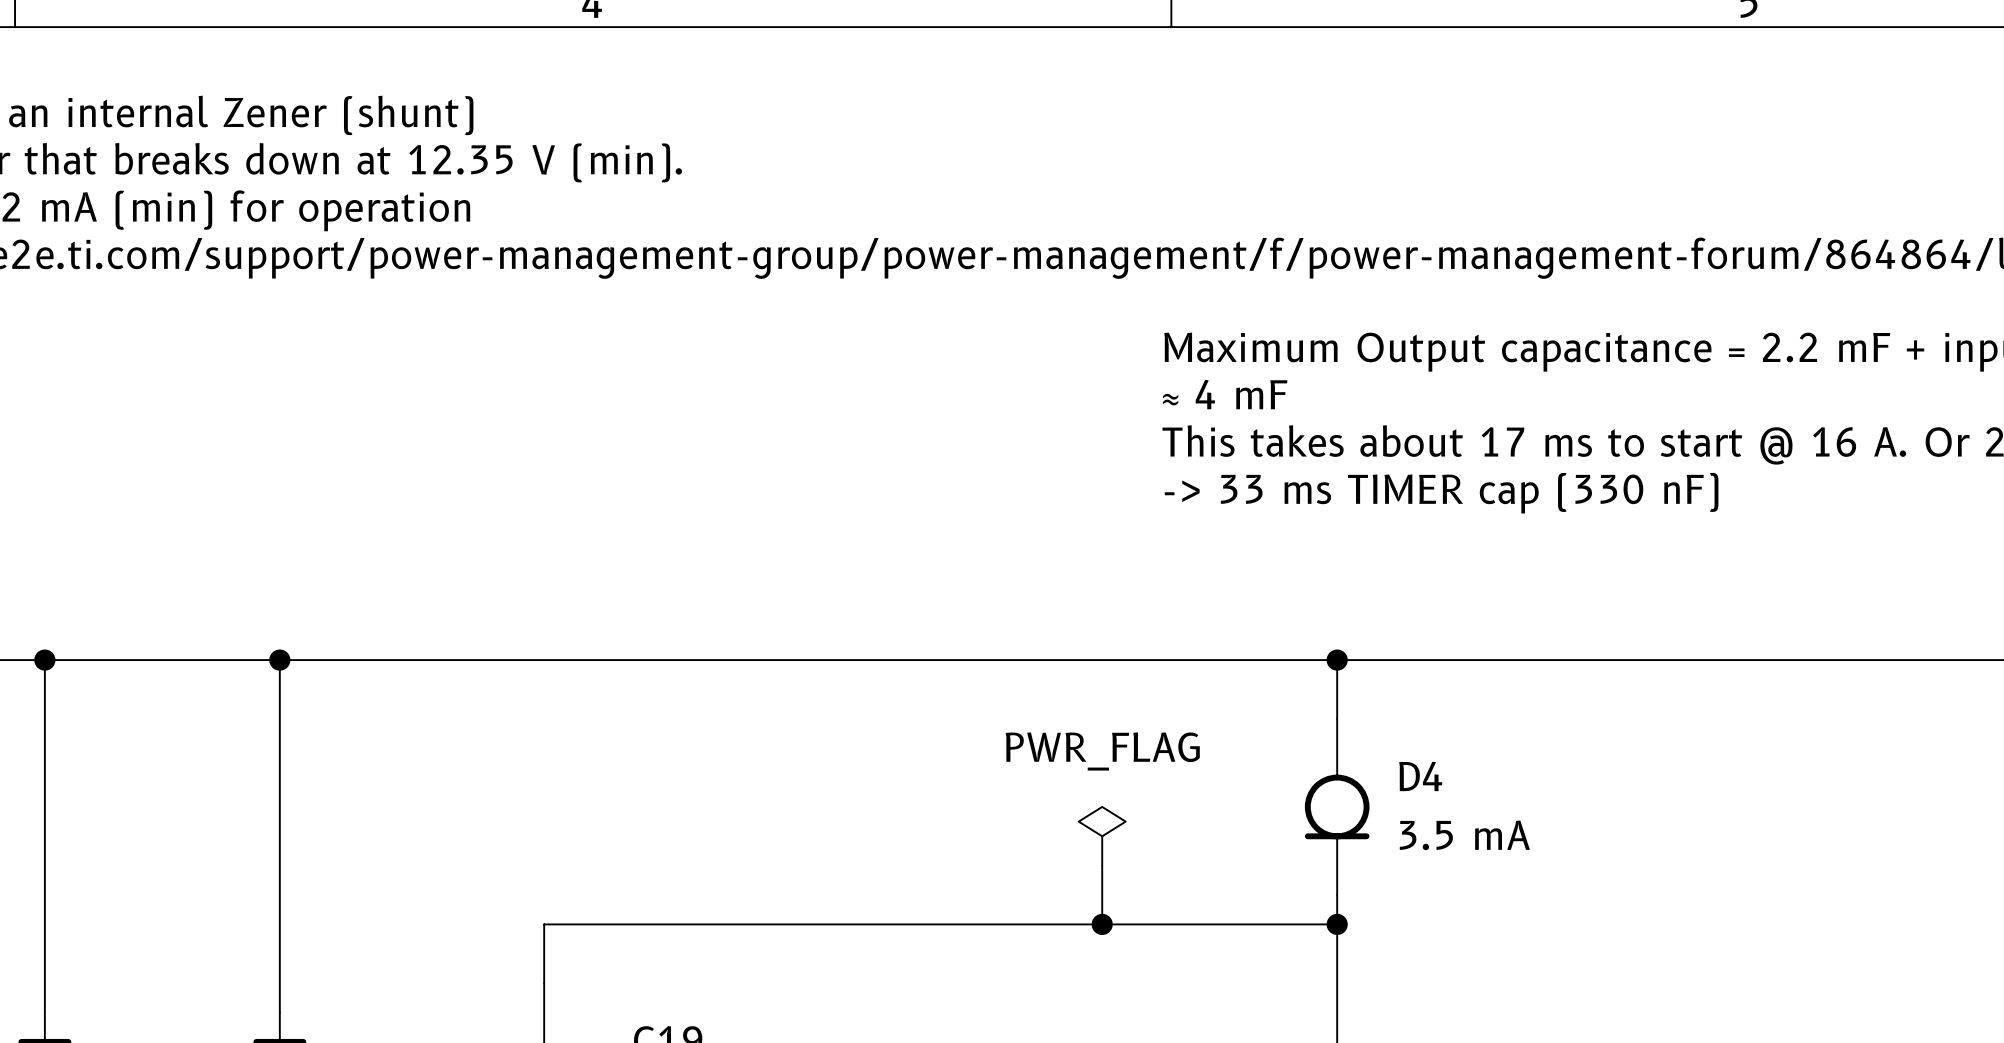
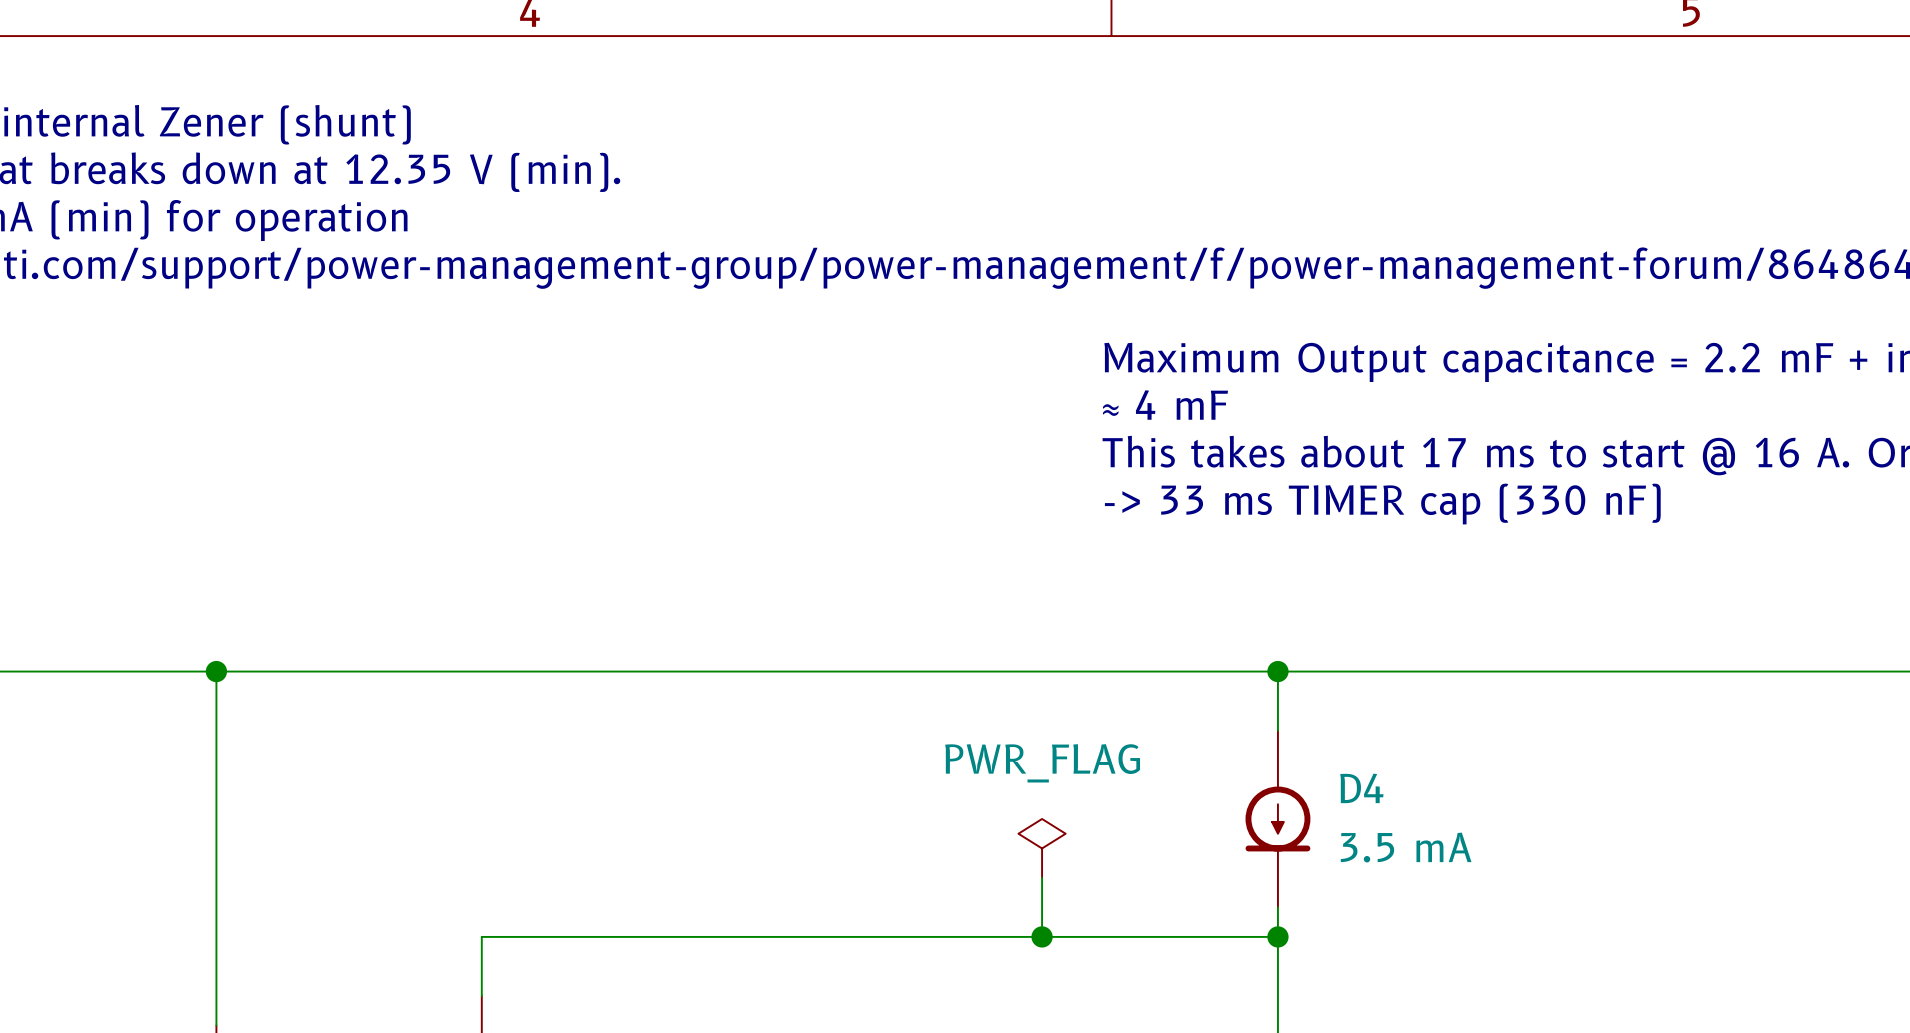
D4 symbol: [1304, 718, 1370, 896] -> [1245, 730, 1311, 908]

